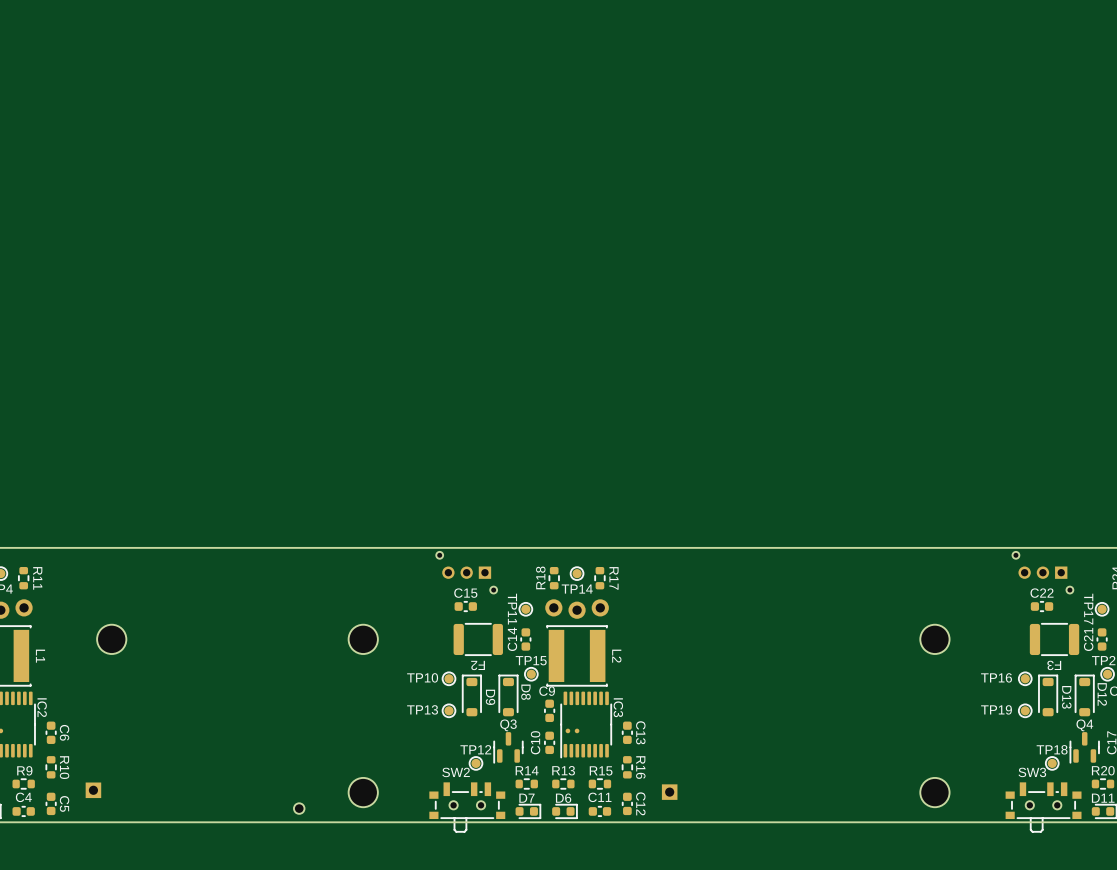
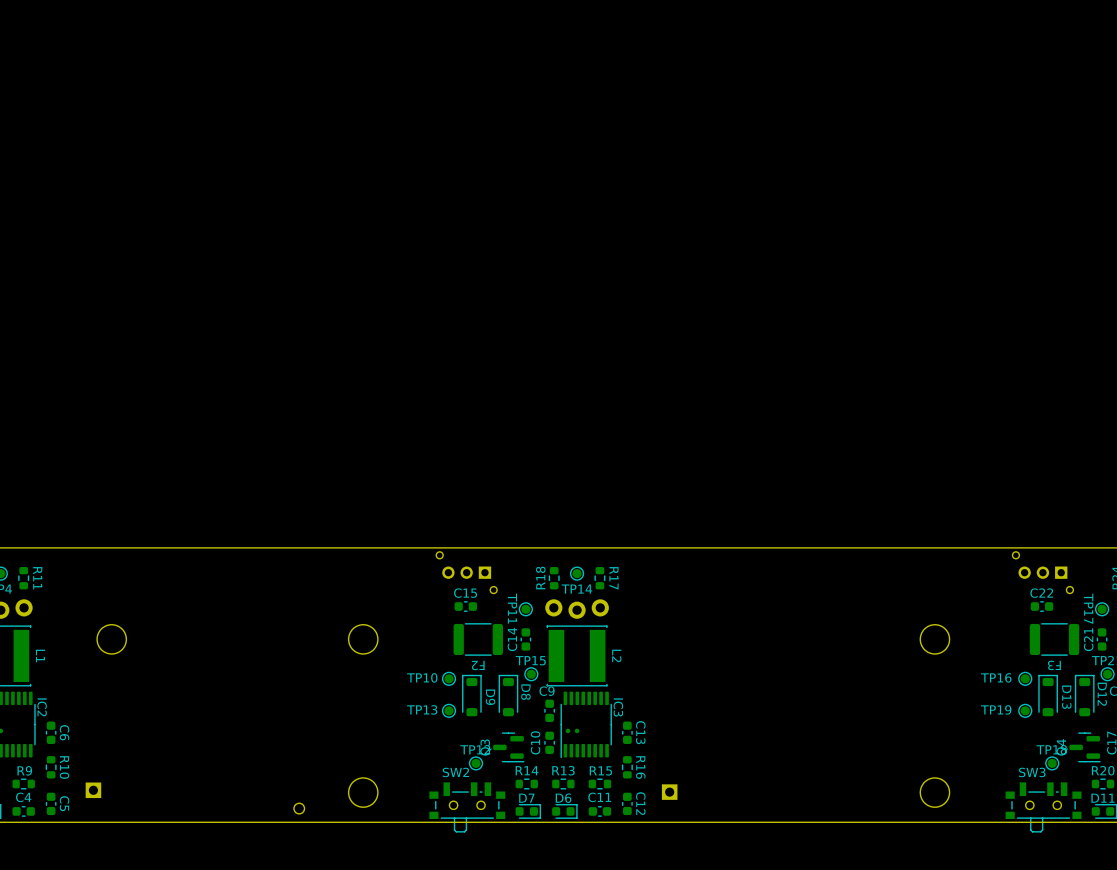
Q3 rotation: 0° (508, 747) -> 90° counterclockwise (508, 747)
Q4 rotation: 0° (1084, 747) -> 90° counterclockwise (1084, 747)

